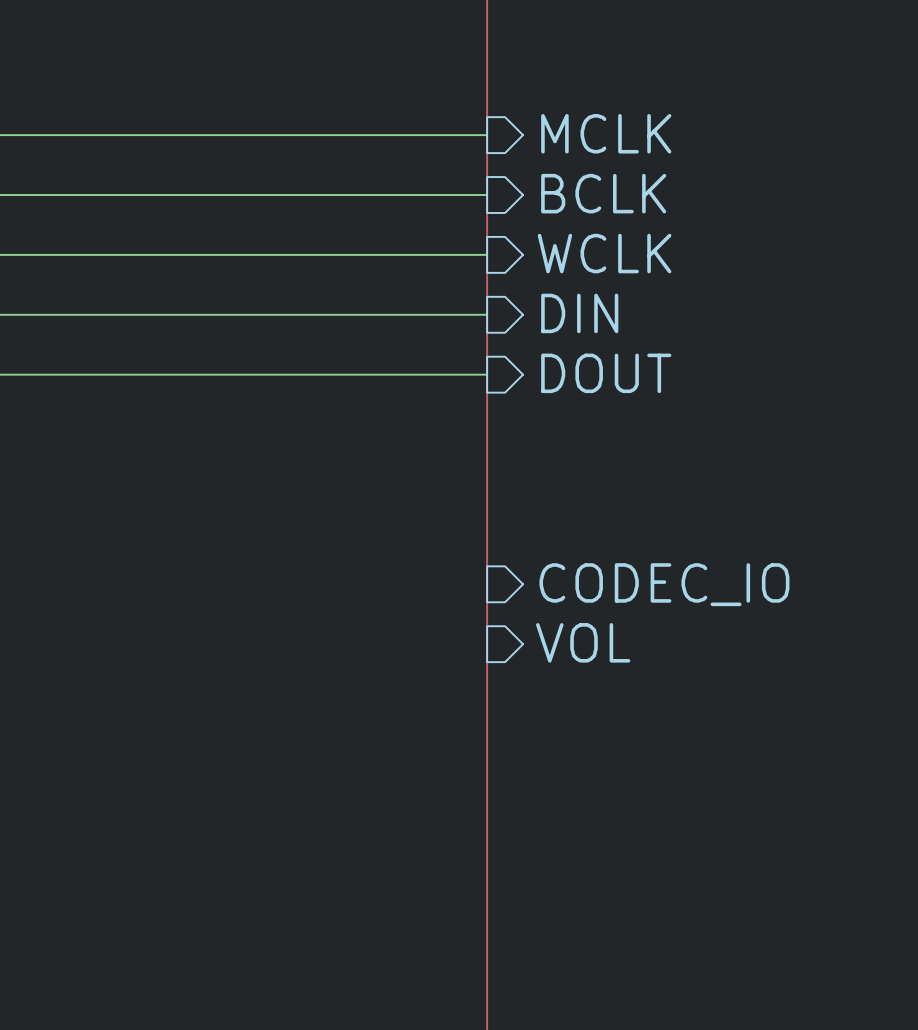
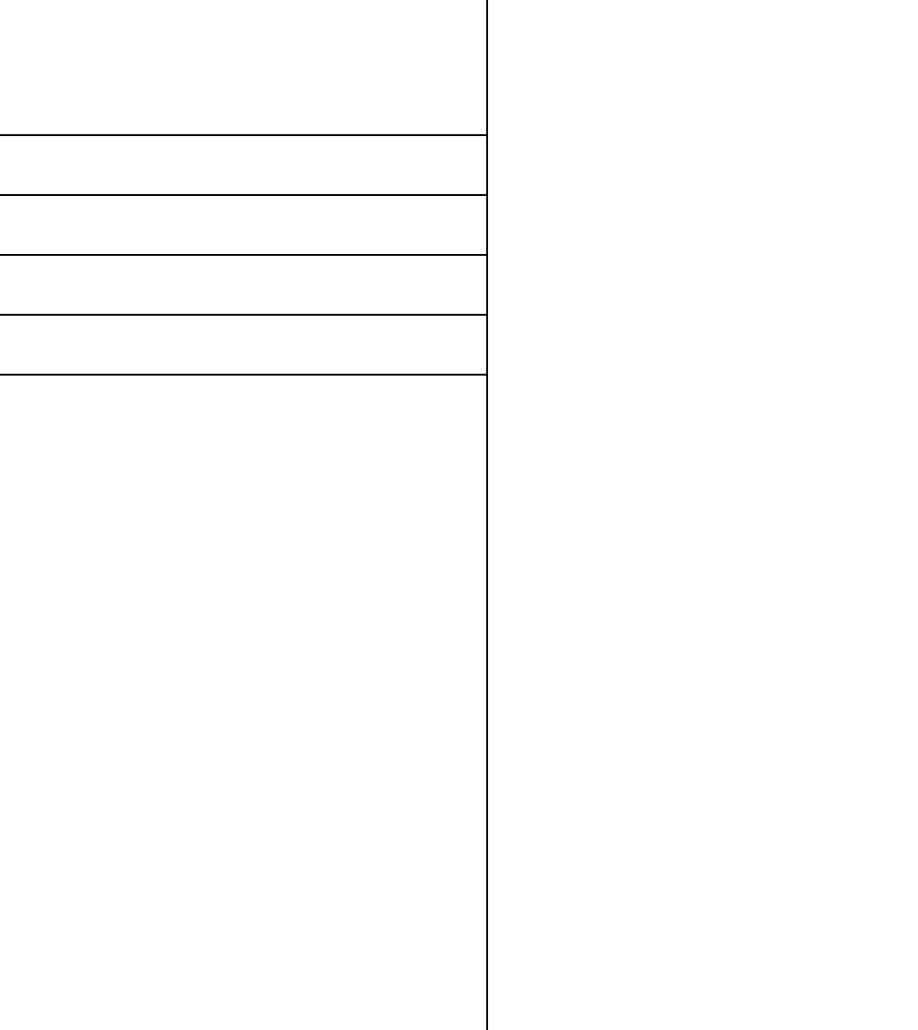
sheet pin: MCLK (606, 133) -> none
sheet pin: BCLK (603, 193) -> none
sheet pin: WCLK (604, 253) -> none
sheet pin: DIN (579, 313) -> none
sheet pin: DOUT (606, 373) -> none
sheet pin: CODEC_IO (664, 584) -> none
sheet pin: VOL (583, 642) -> none

